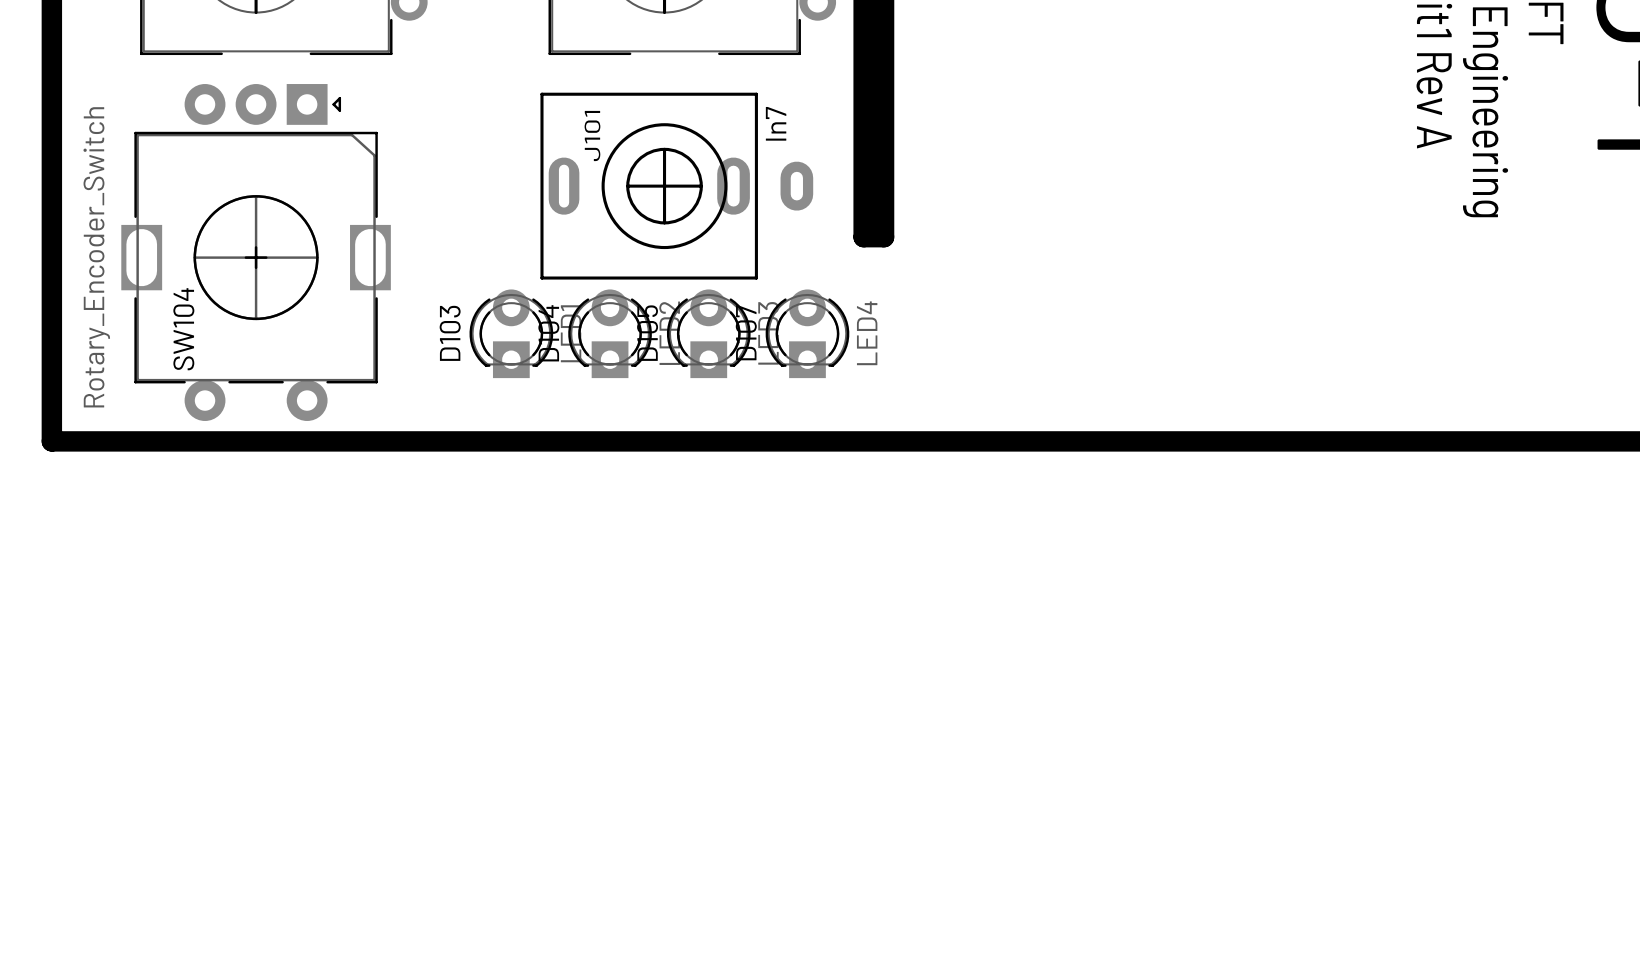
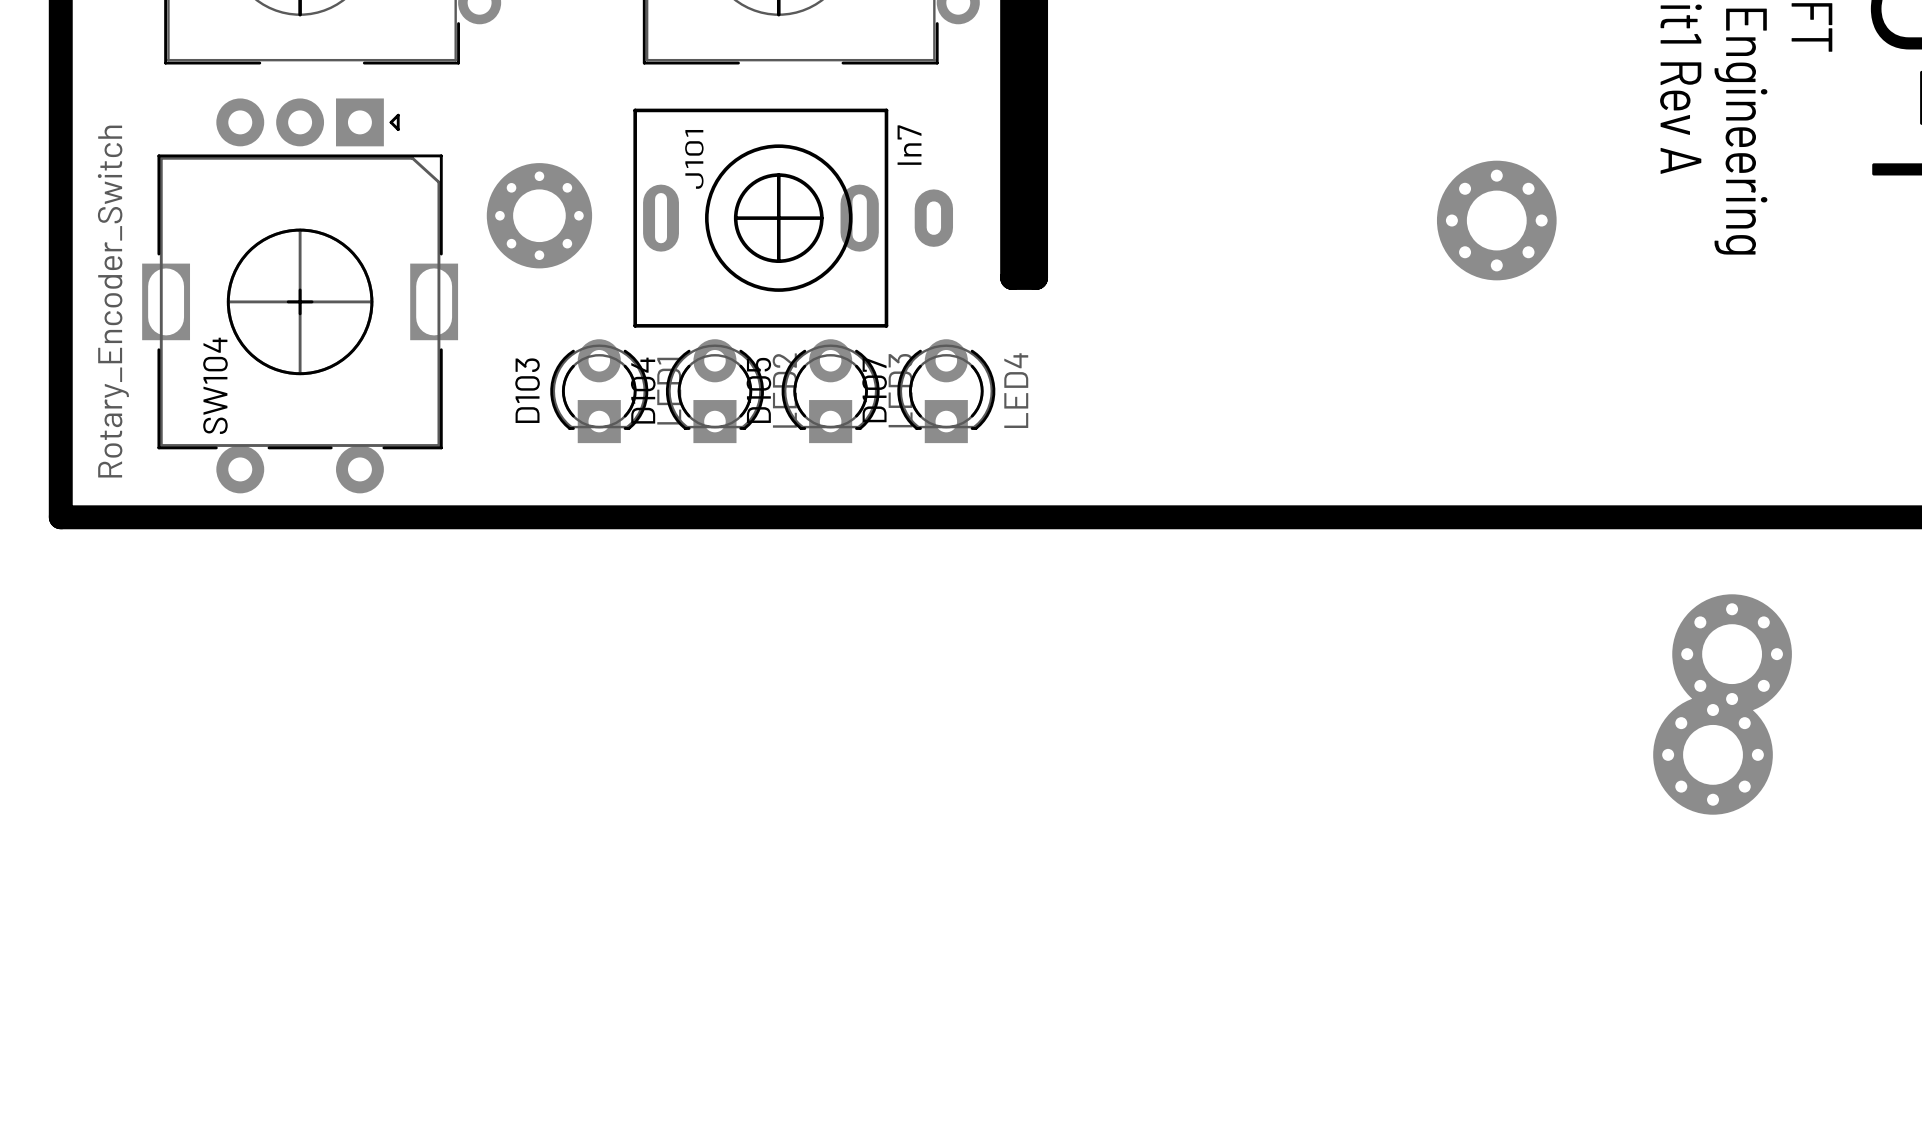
part: none -> (539, 215)
part: none -> (1496, 220)
part: none -> (1732, 654)
part: none -> (1713, 754)

